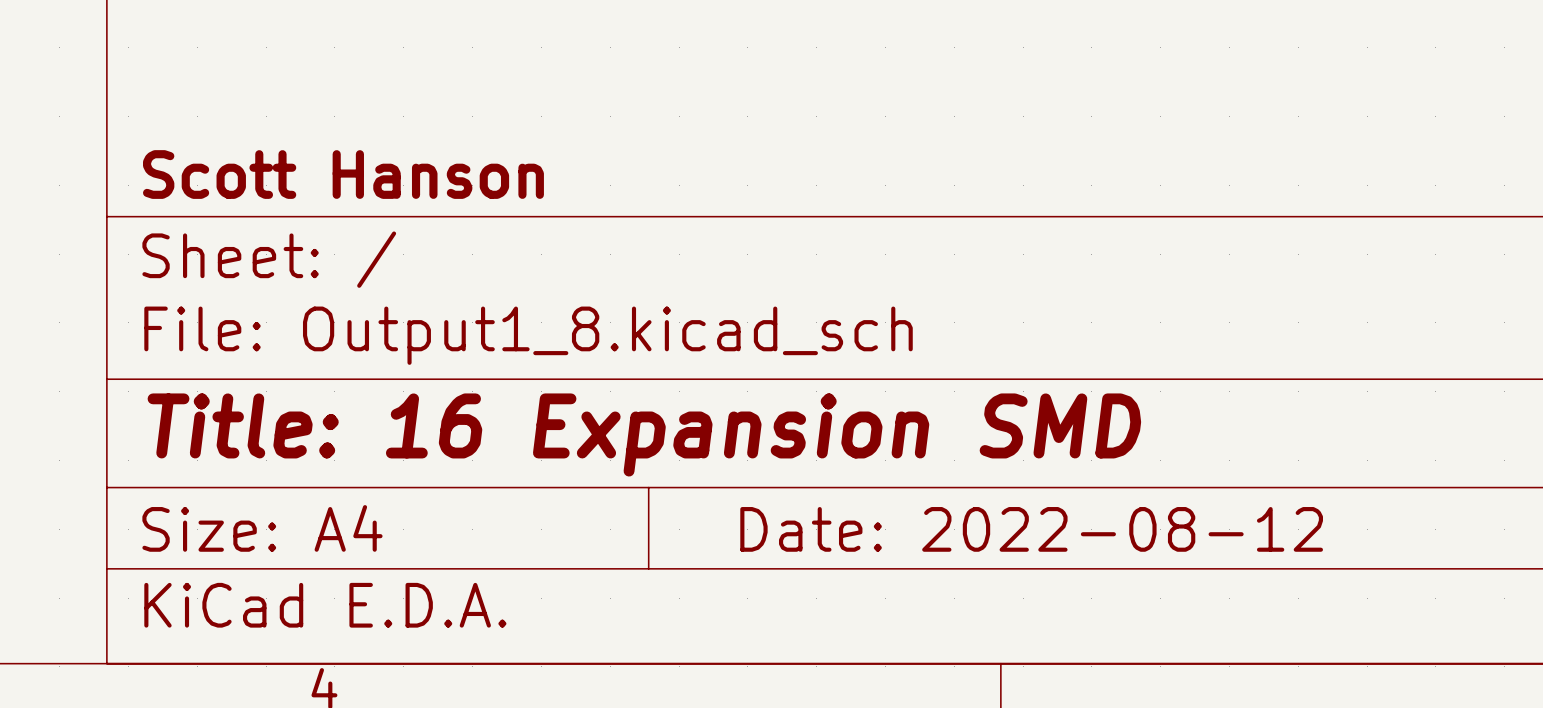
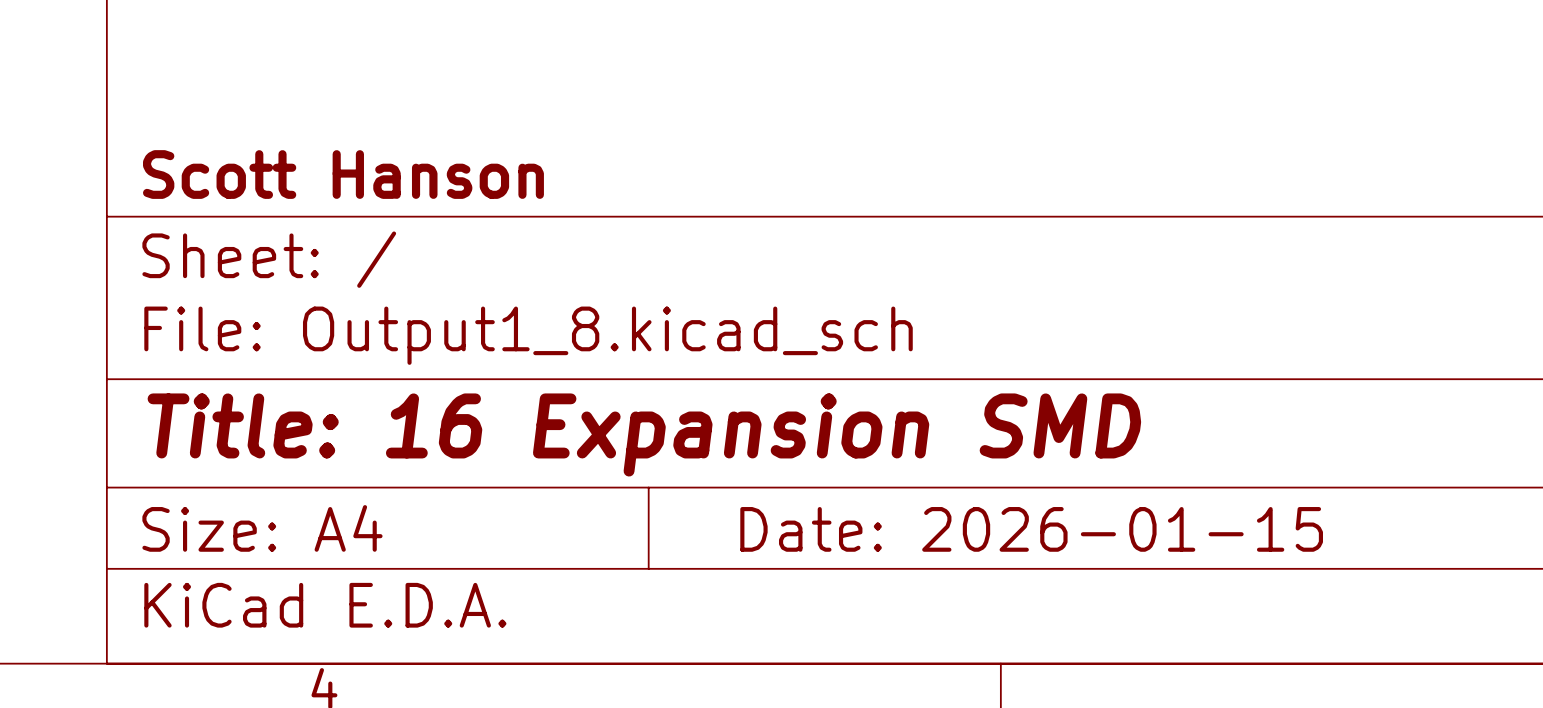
title block: Date: 2022-08-12 (1031, 529) -> Date: 2026-01-15 (1031, 529)

